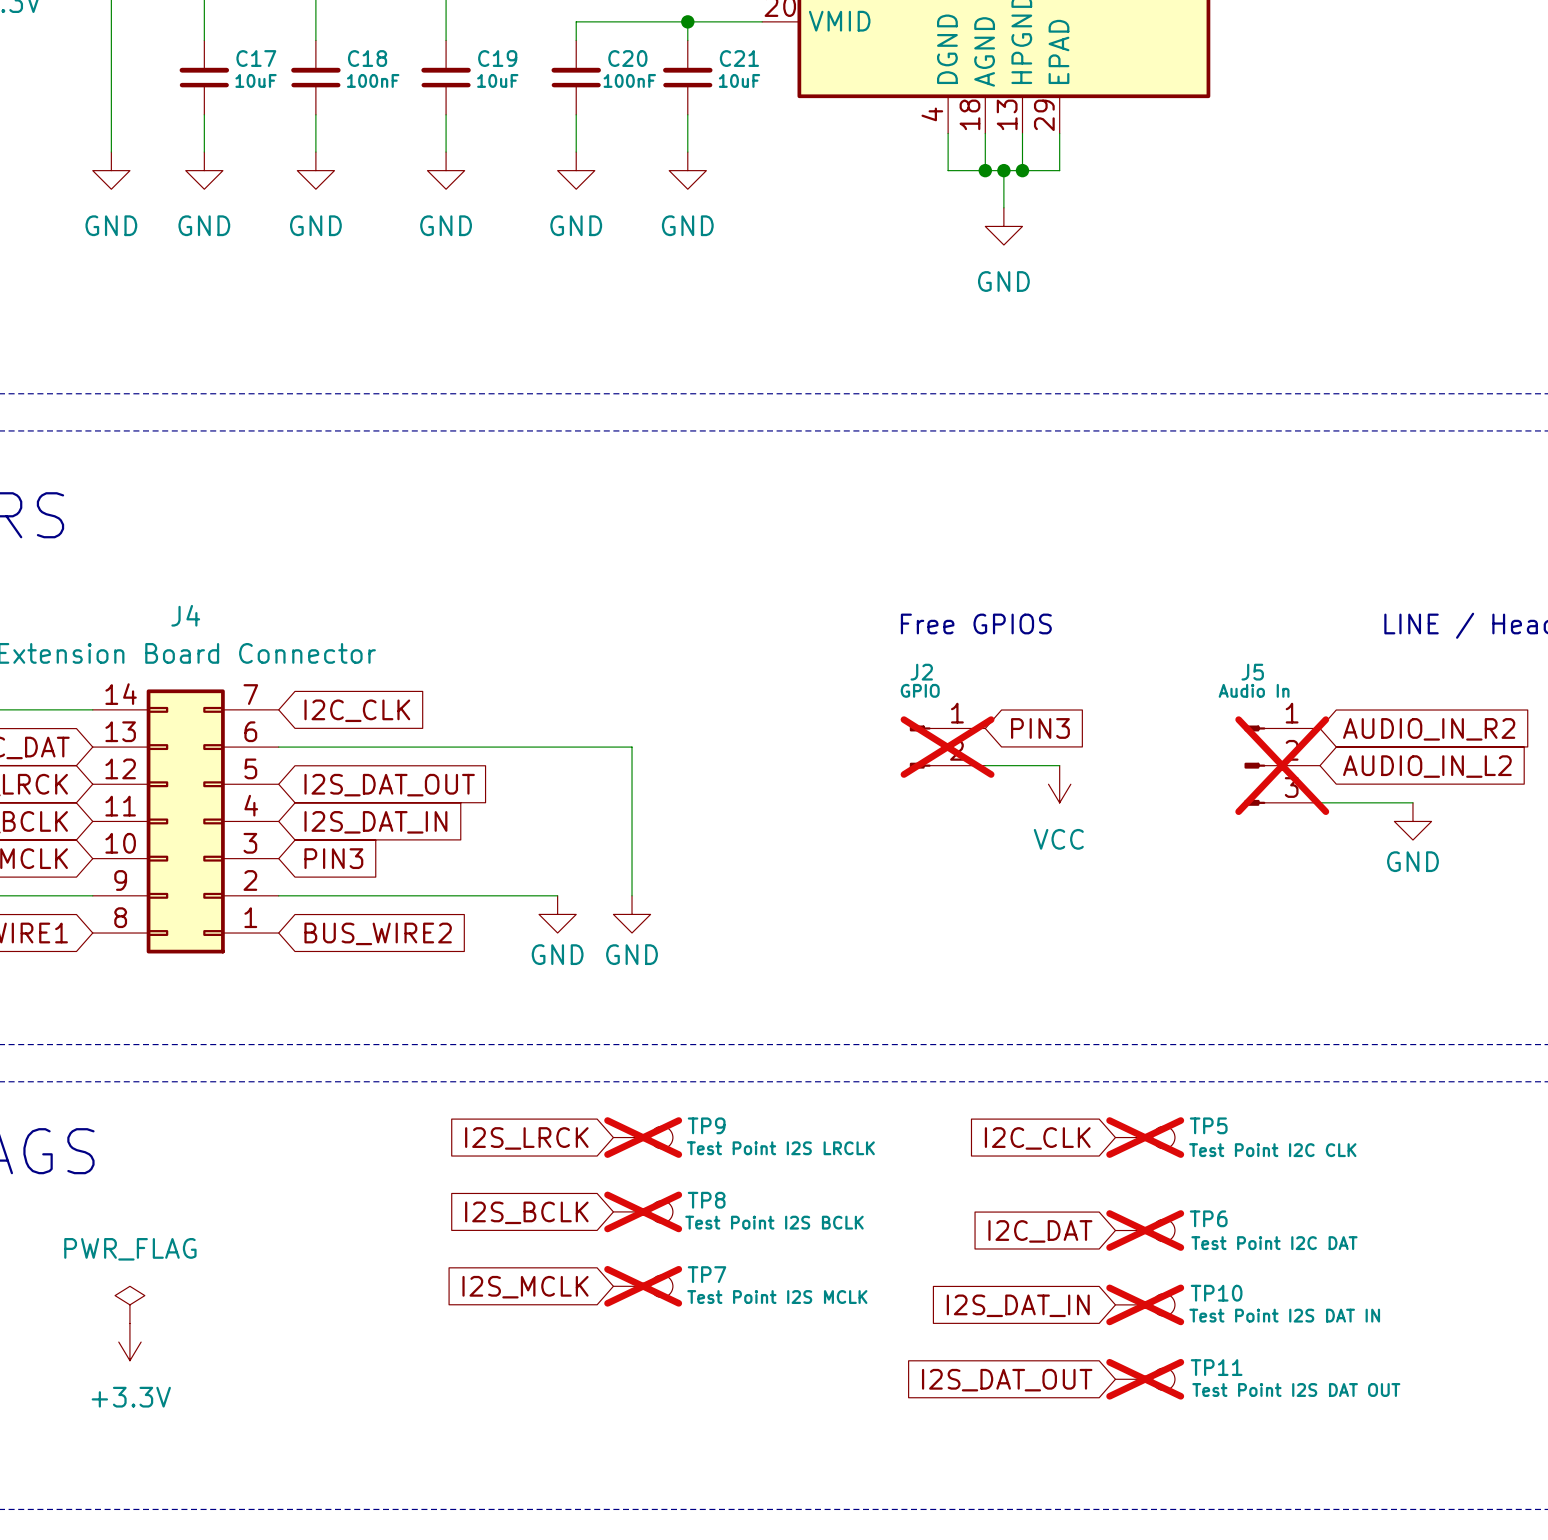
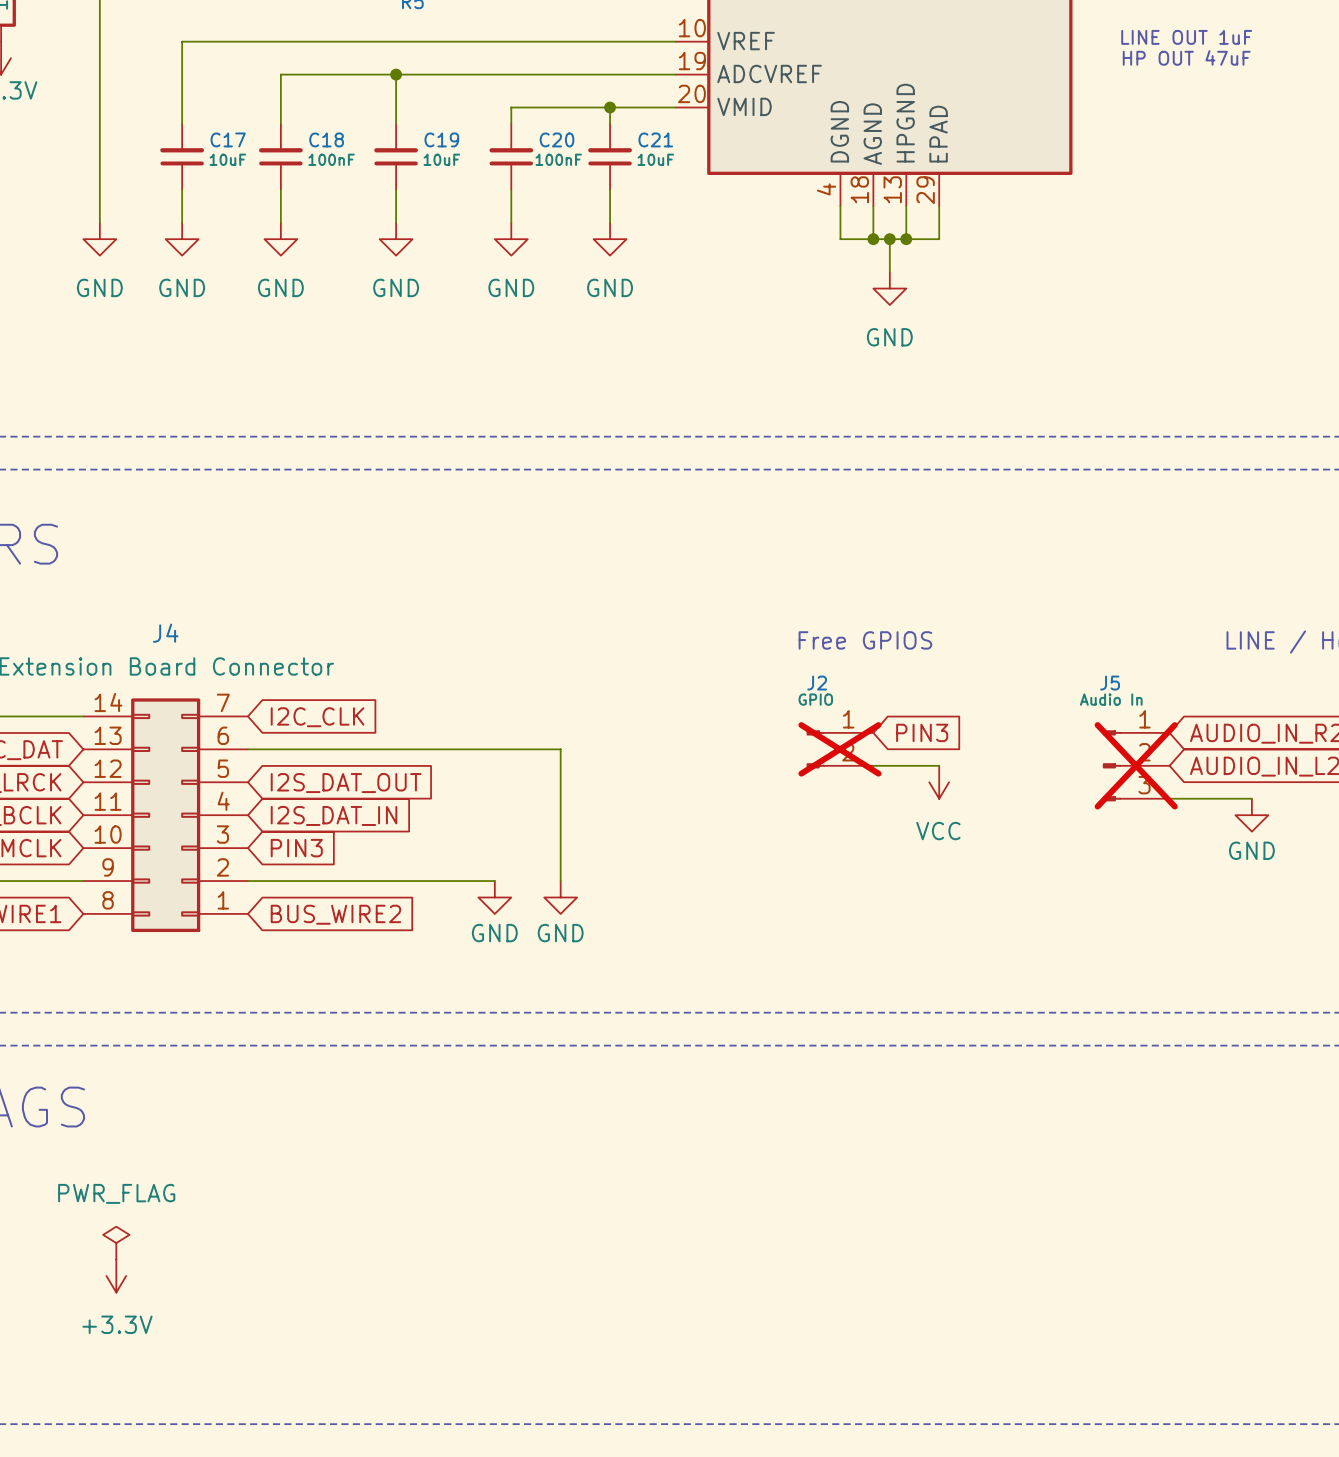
TP9: Test Point I2S LRCLK (643, 1137) -> none
TP5: Test Point I2C CLK (1145, 1137) -> none
global label: I2S_LRCK (526, 1138) -> none
global label: I2C_CLK (1037, 1138) -> none
TP8: Test Point I2S BCLK (643, 1211) -> none
global label: I2S_BCLK (526, 1212) -> none
TP6: Test Point I2C DAT (1145, 1230) -> none
global label: I2C_DAT (1040, 1231) -> none
TP7: Test Point I2S MCLK (643, 1286) -> none
global label: I2S_MCLK (525, 1287) -> none
TP10: Test Point I2S DAT IN (1145, 1304) -> none
global label: I2S_DAT_IN (1018, 1305) -> none
TP11: Test Point I2S DAT OUT (1145, 1379) -> none
global label: I2S_DAT_OUT (1007, 1380) -> none

